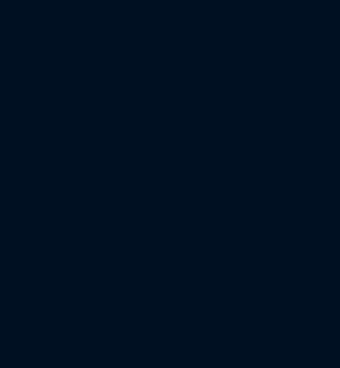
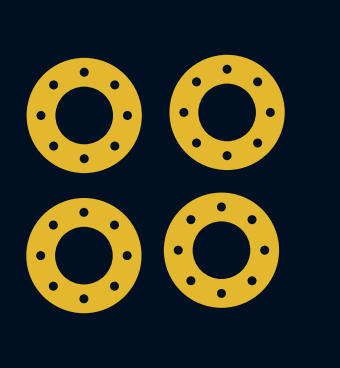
part: none -> (227, 112)
part: none -> (84, 115)
part: none -> (221, 250)
part: none -> (83, 255)

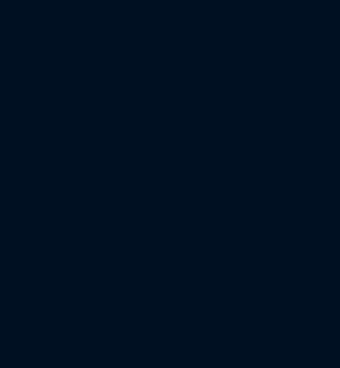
part: (227, 112) -> none
part: (84, 115) -> none
part: (221, 250) -> none
part: (83, 255) -> none

